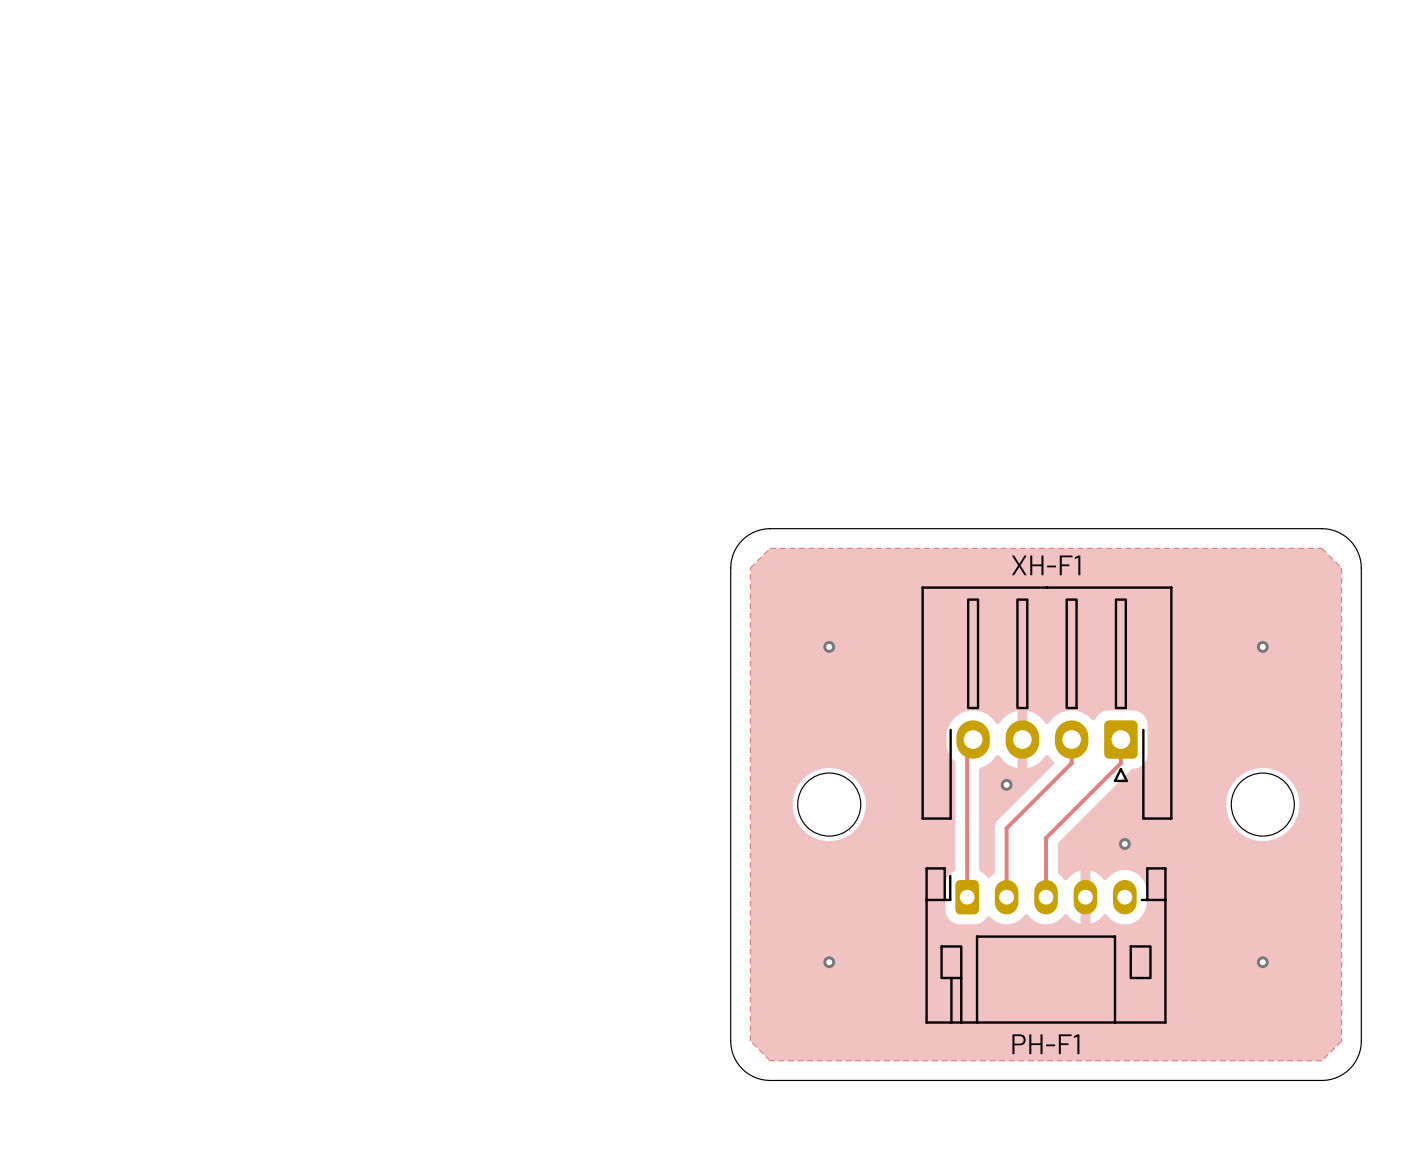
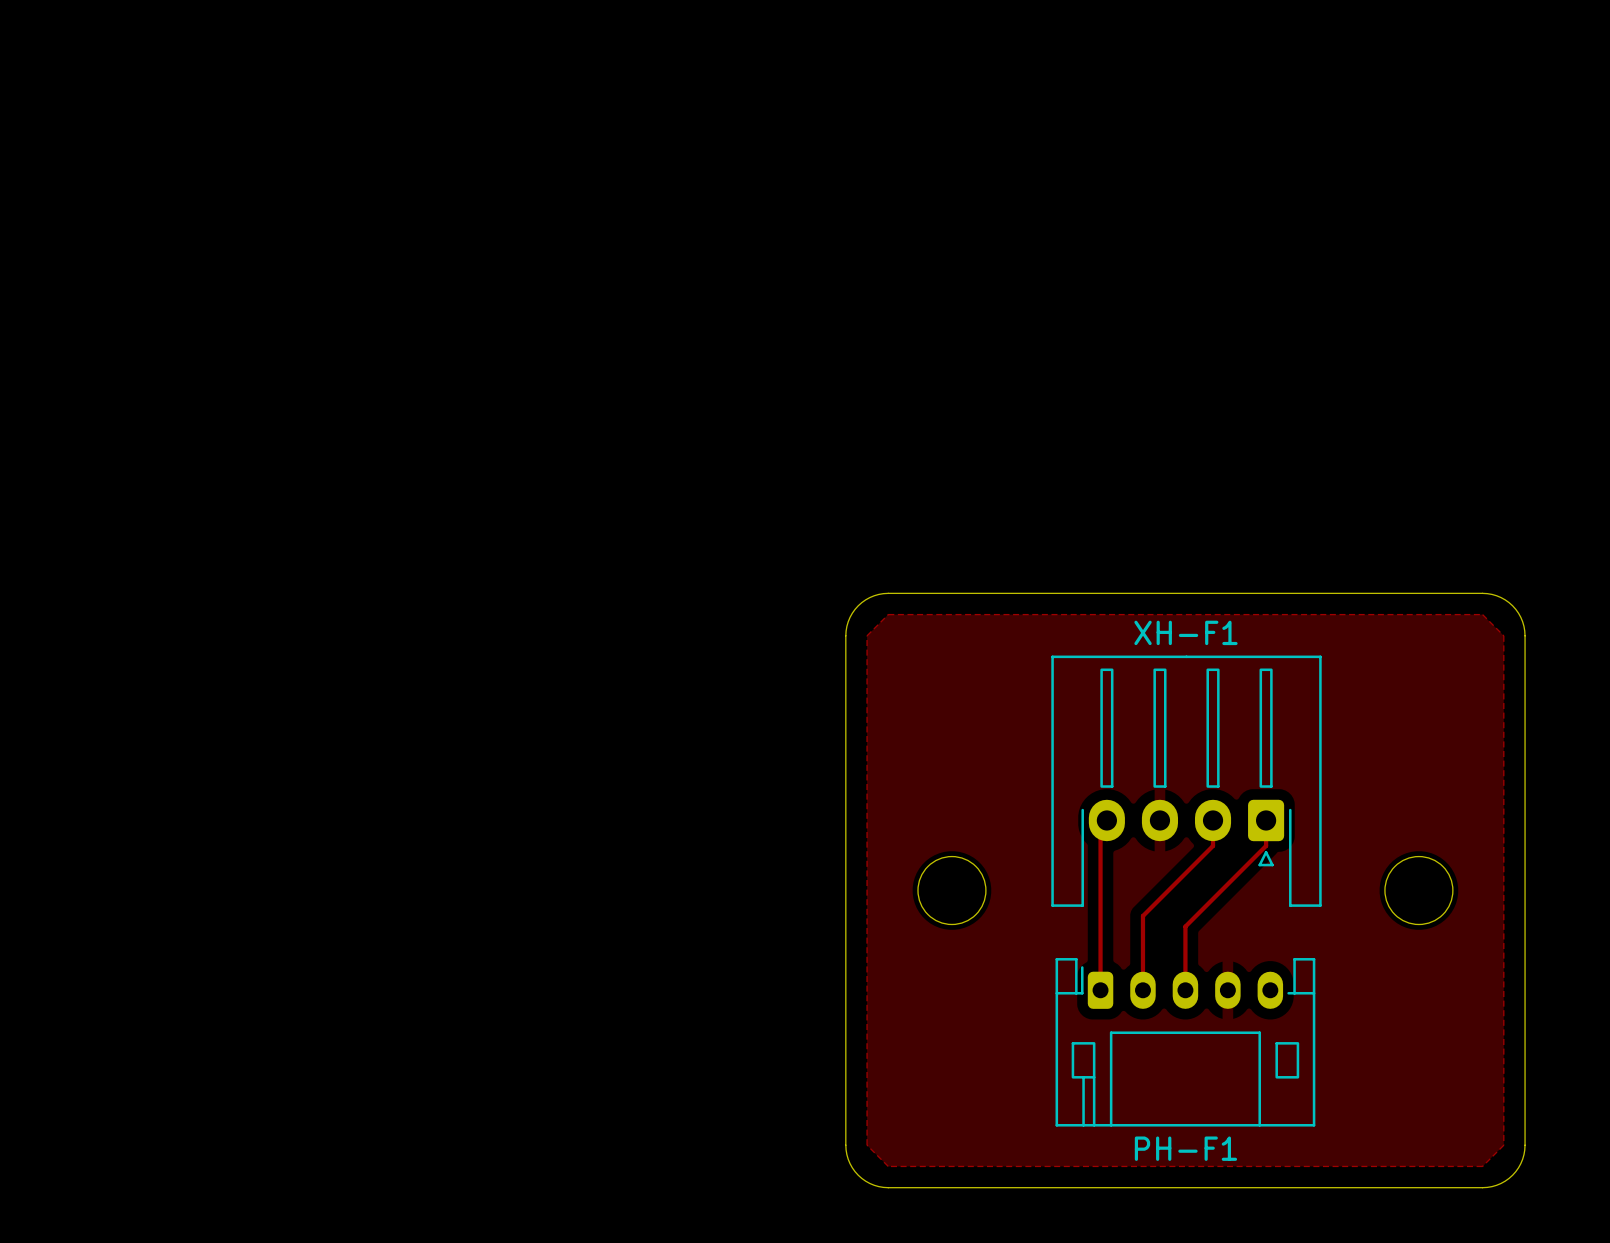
via: (829, 646) -> none
via: (1262, 646) -> none
via: (1006, 784) -> none
via: (1124, 843) -> none
via: (829, 962) -> none
via: (1262, 962) -> none

